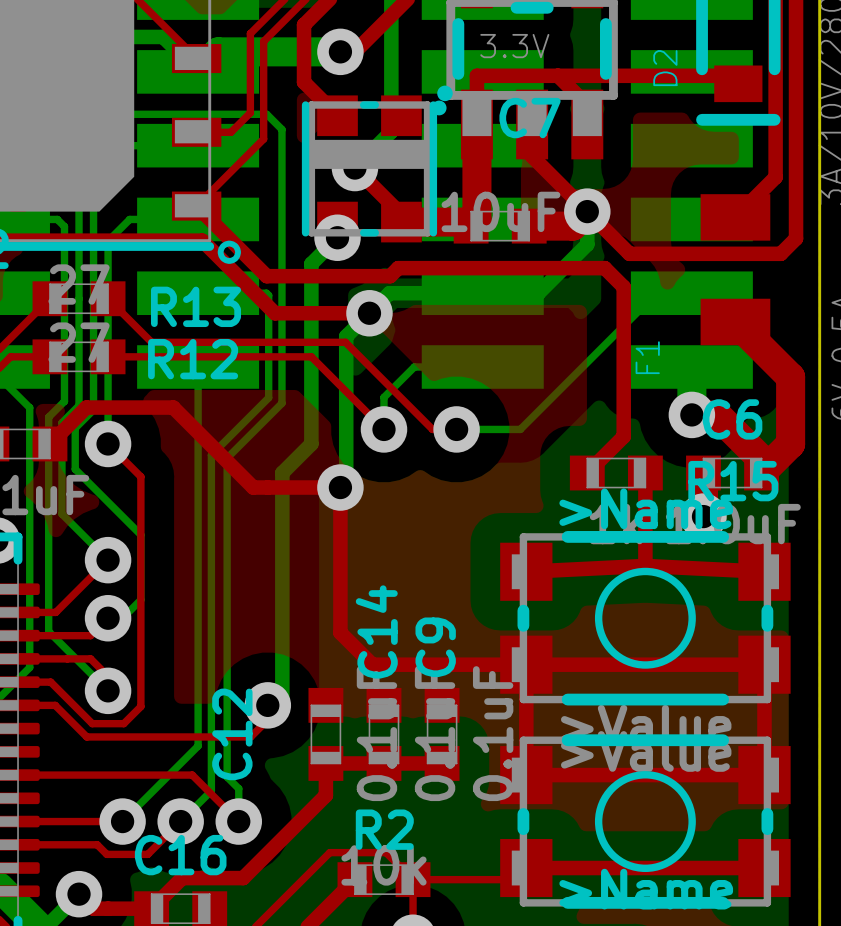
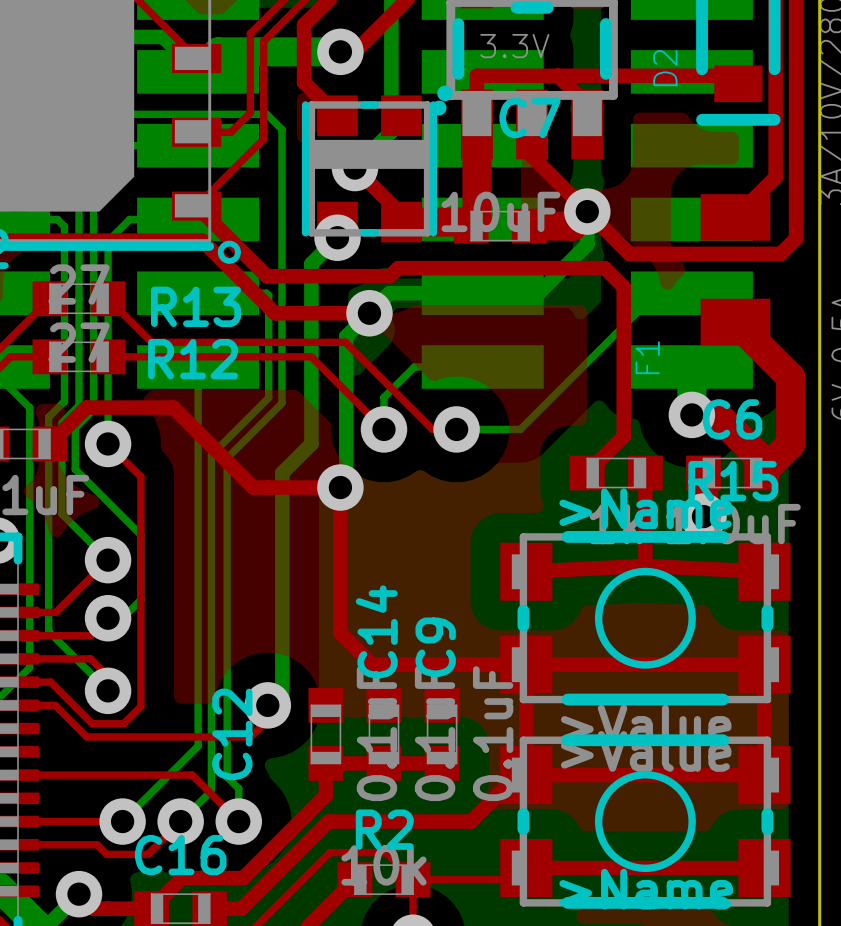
top track: none -> (526, 775) (517, 775) (471, 821) (328, 821) (241, 908) (209, 908)

